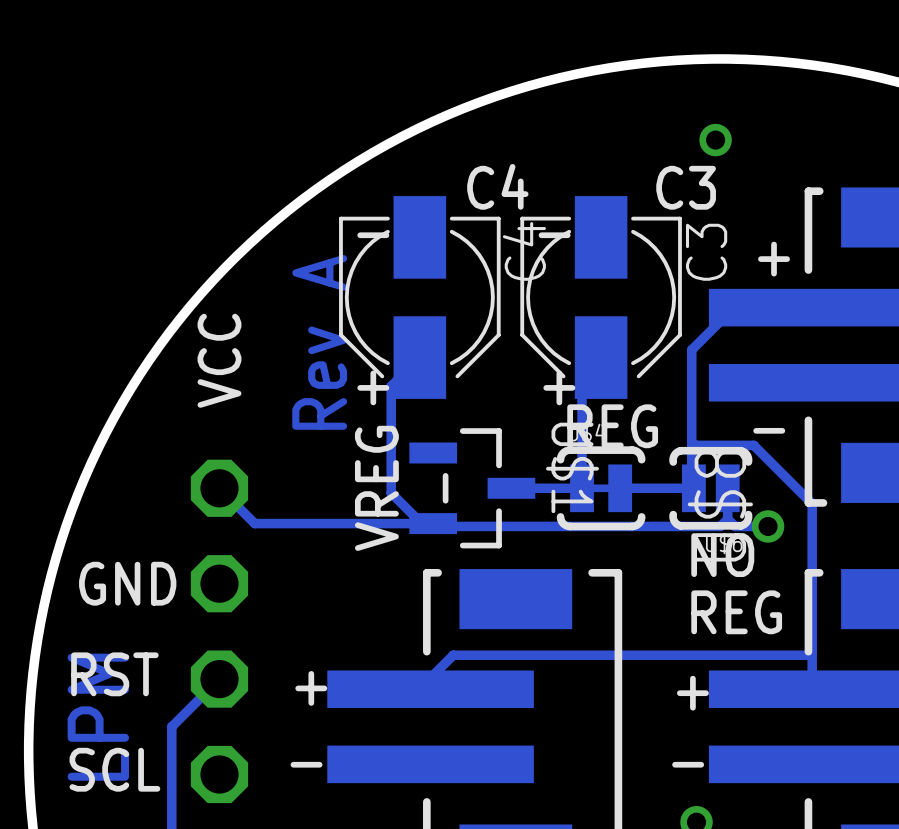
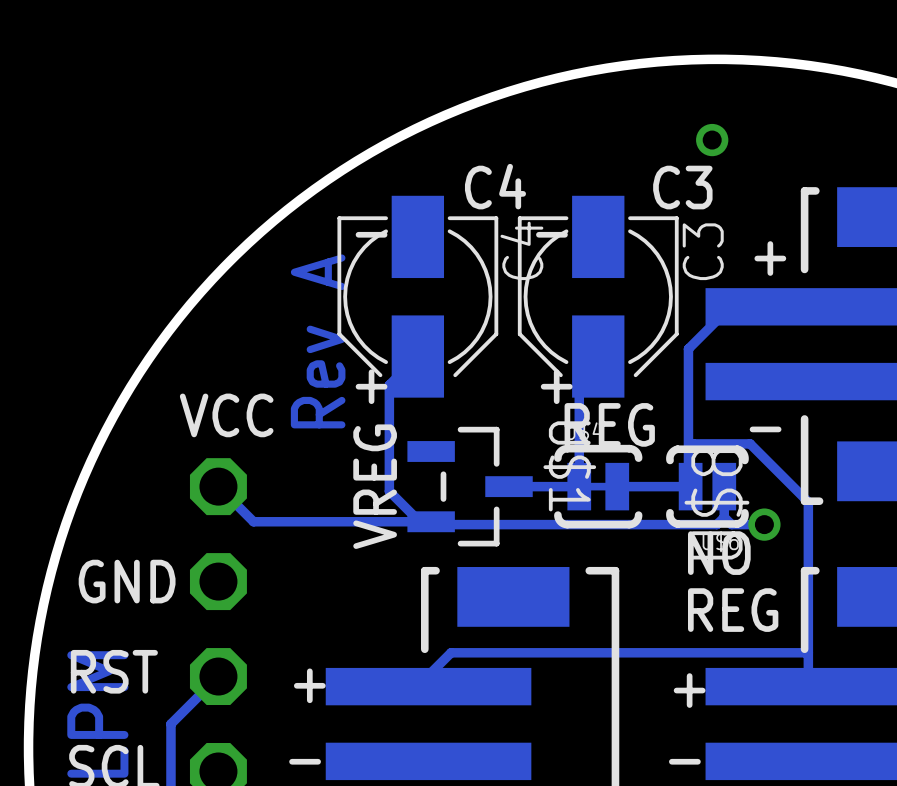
text rotation: 0° (219, 360) -> 90° clockwise (226, 415)

